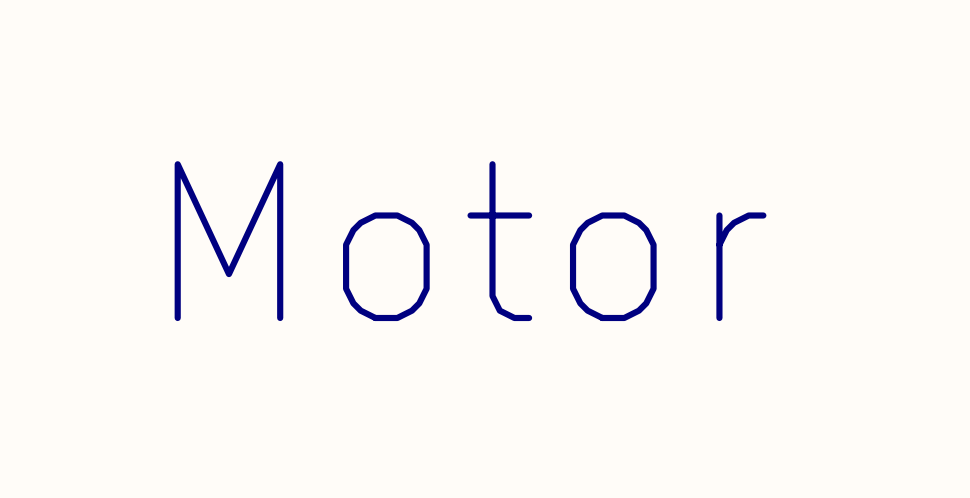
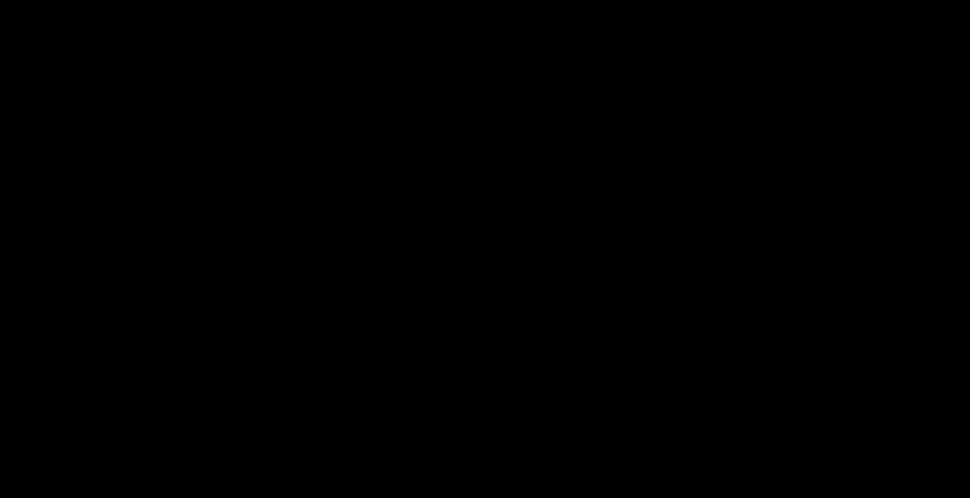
text: Motor (470, 241) -> none

